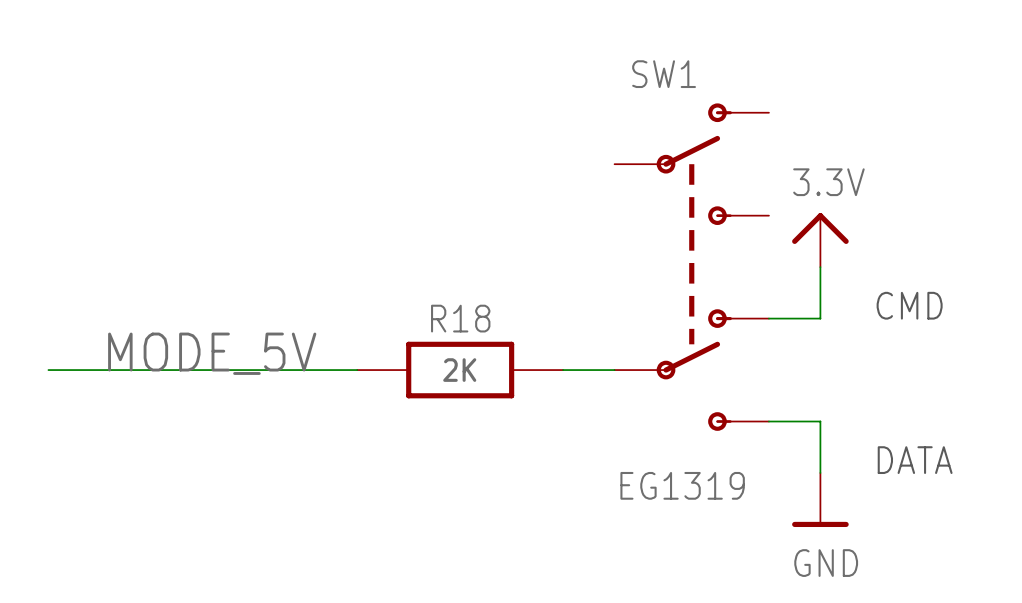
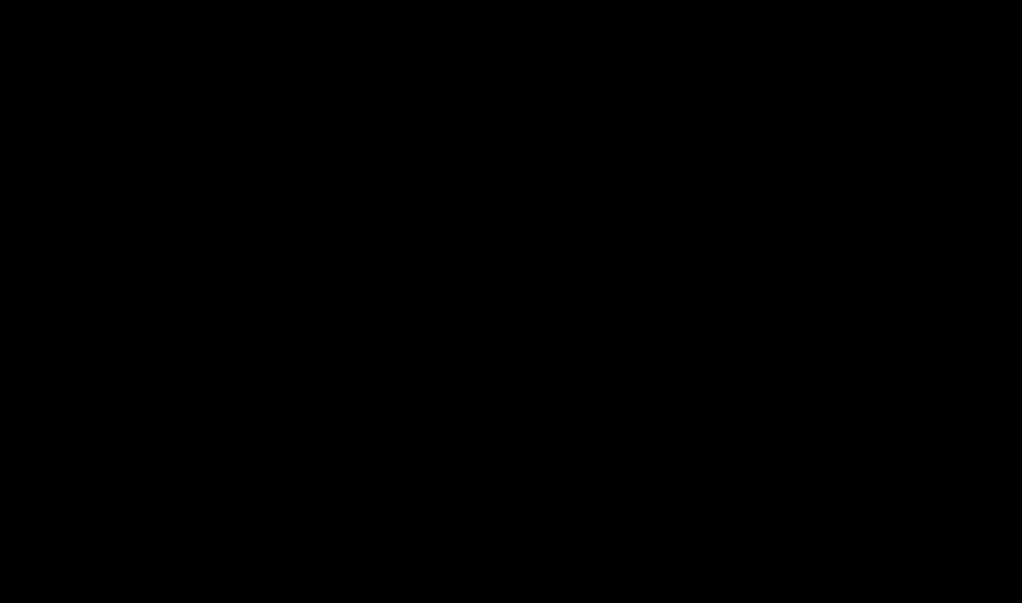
power symbol: 3.3V (820, 240) -> none
SW1: EG1319 (691, 267) -> none
wire: (820, 267) (820, 318) (768, 318) -> none
text: CMD (909, 305) -> none
label: MODE_5V (212, 353) -> none
wire: (48, 370) (357, 370) -> none
R18: 2K (460, 370) -> none
wire: (563, 370) (614, 370) -> none
wire: (768, 421) (820, 421) (820, 472) -> none
text: DATA (915, 460) -> none
power symbol: GND (820, 499) -> none

